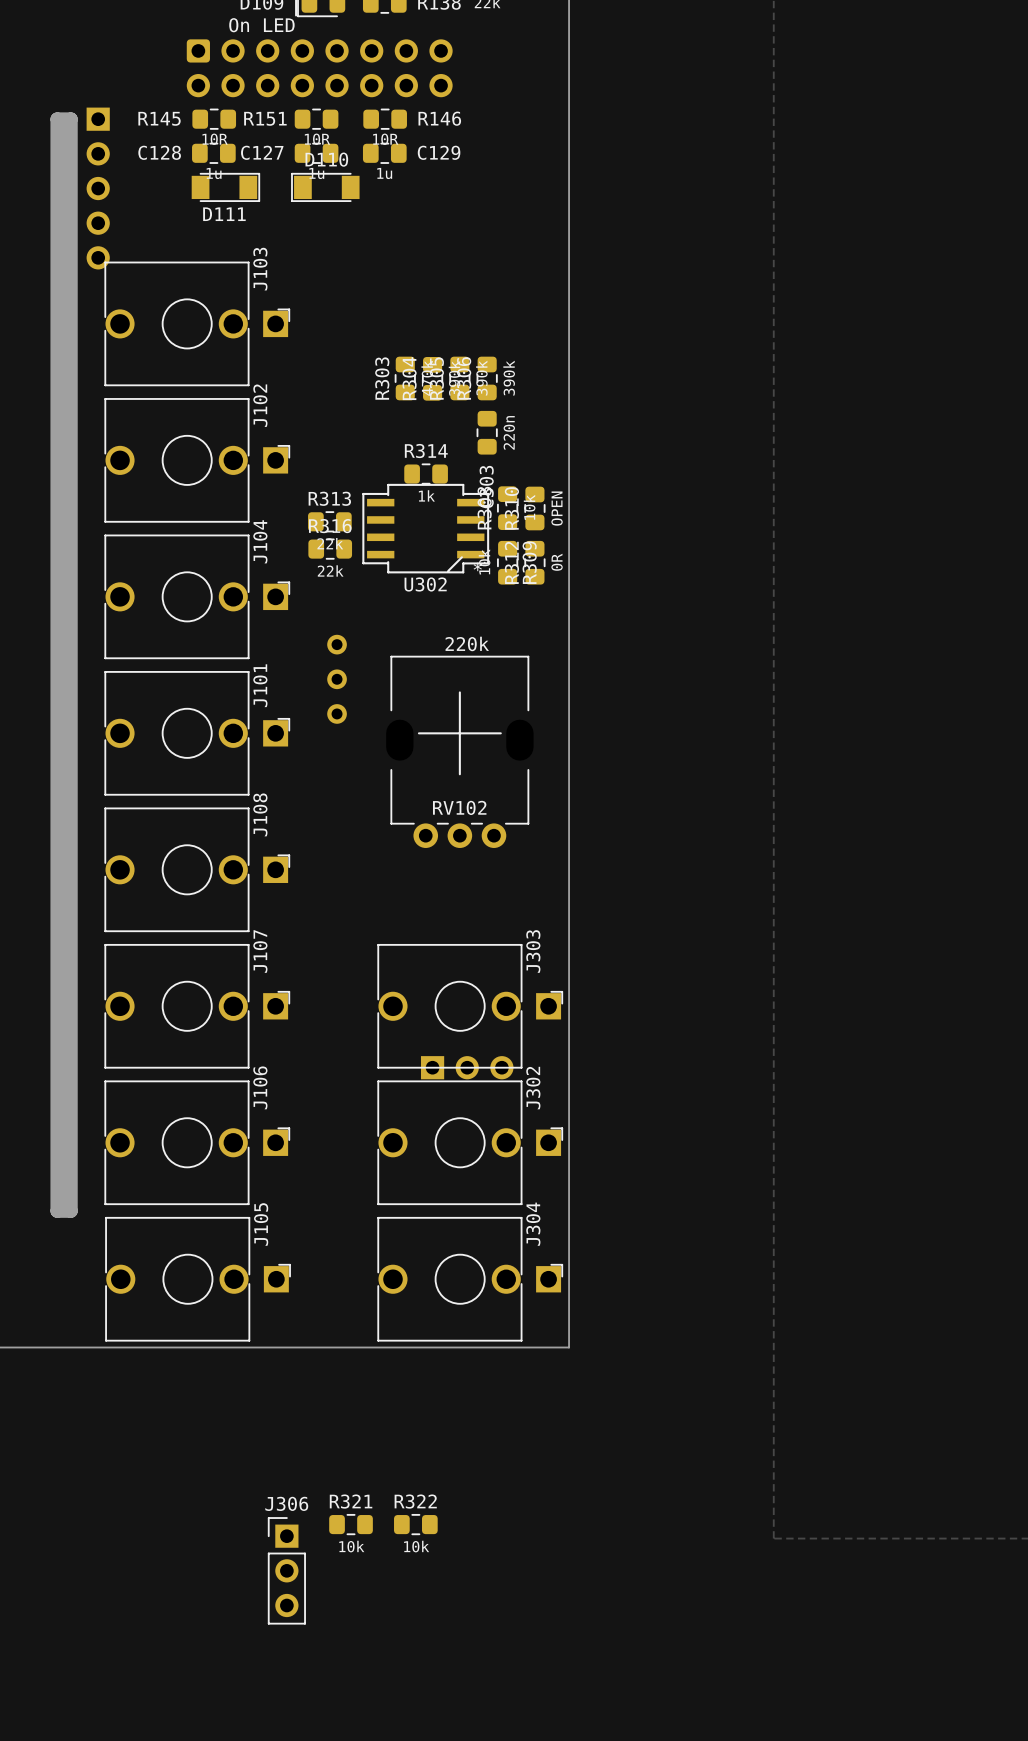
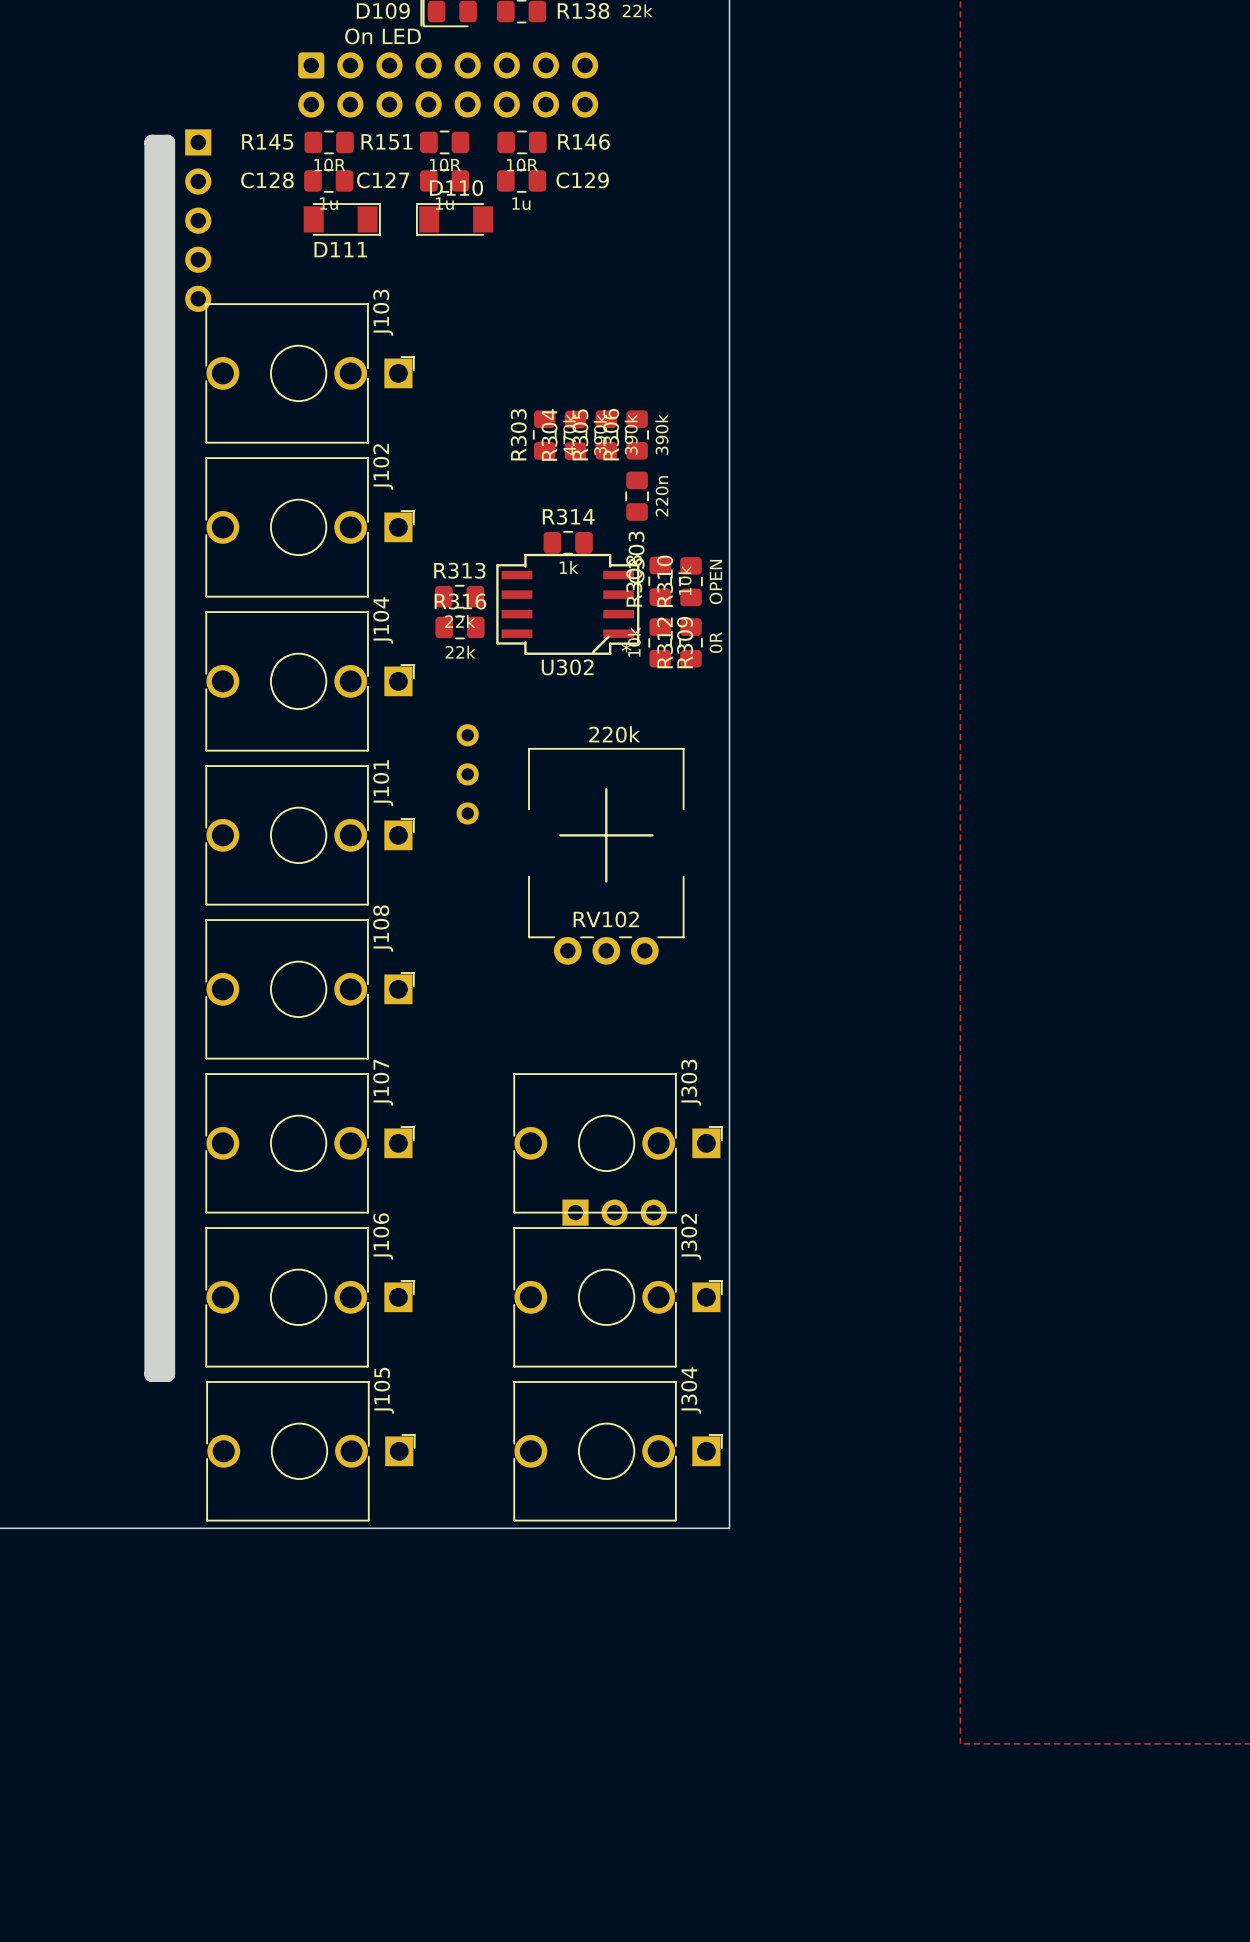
R321: 10k (351, 1524) -> none
R322: 10k (415, 1524) -> none
J306: (286, 1570) -> none

